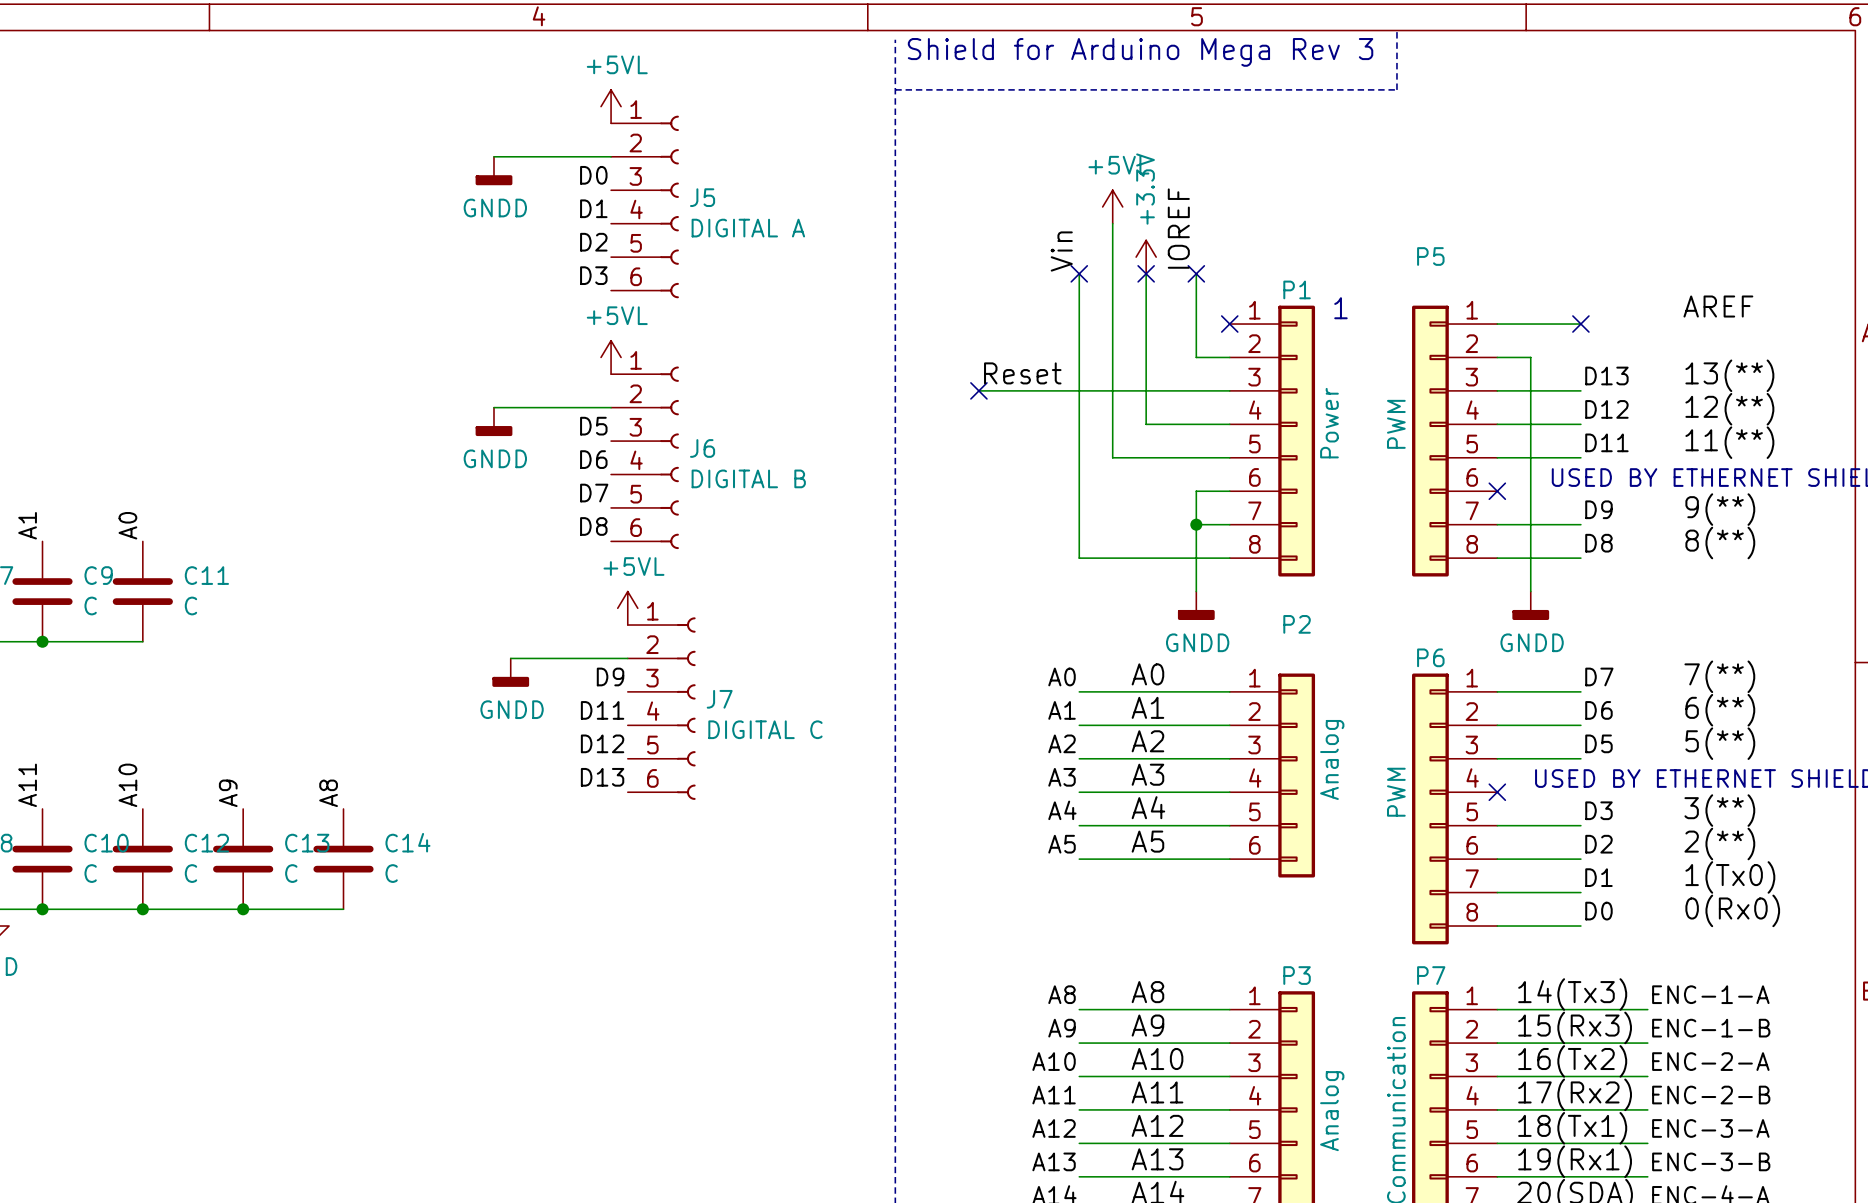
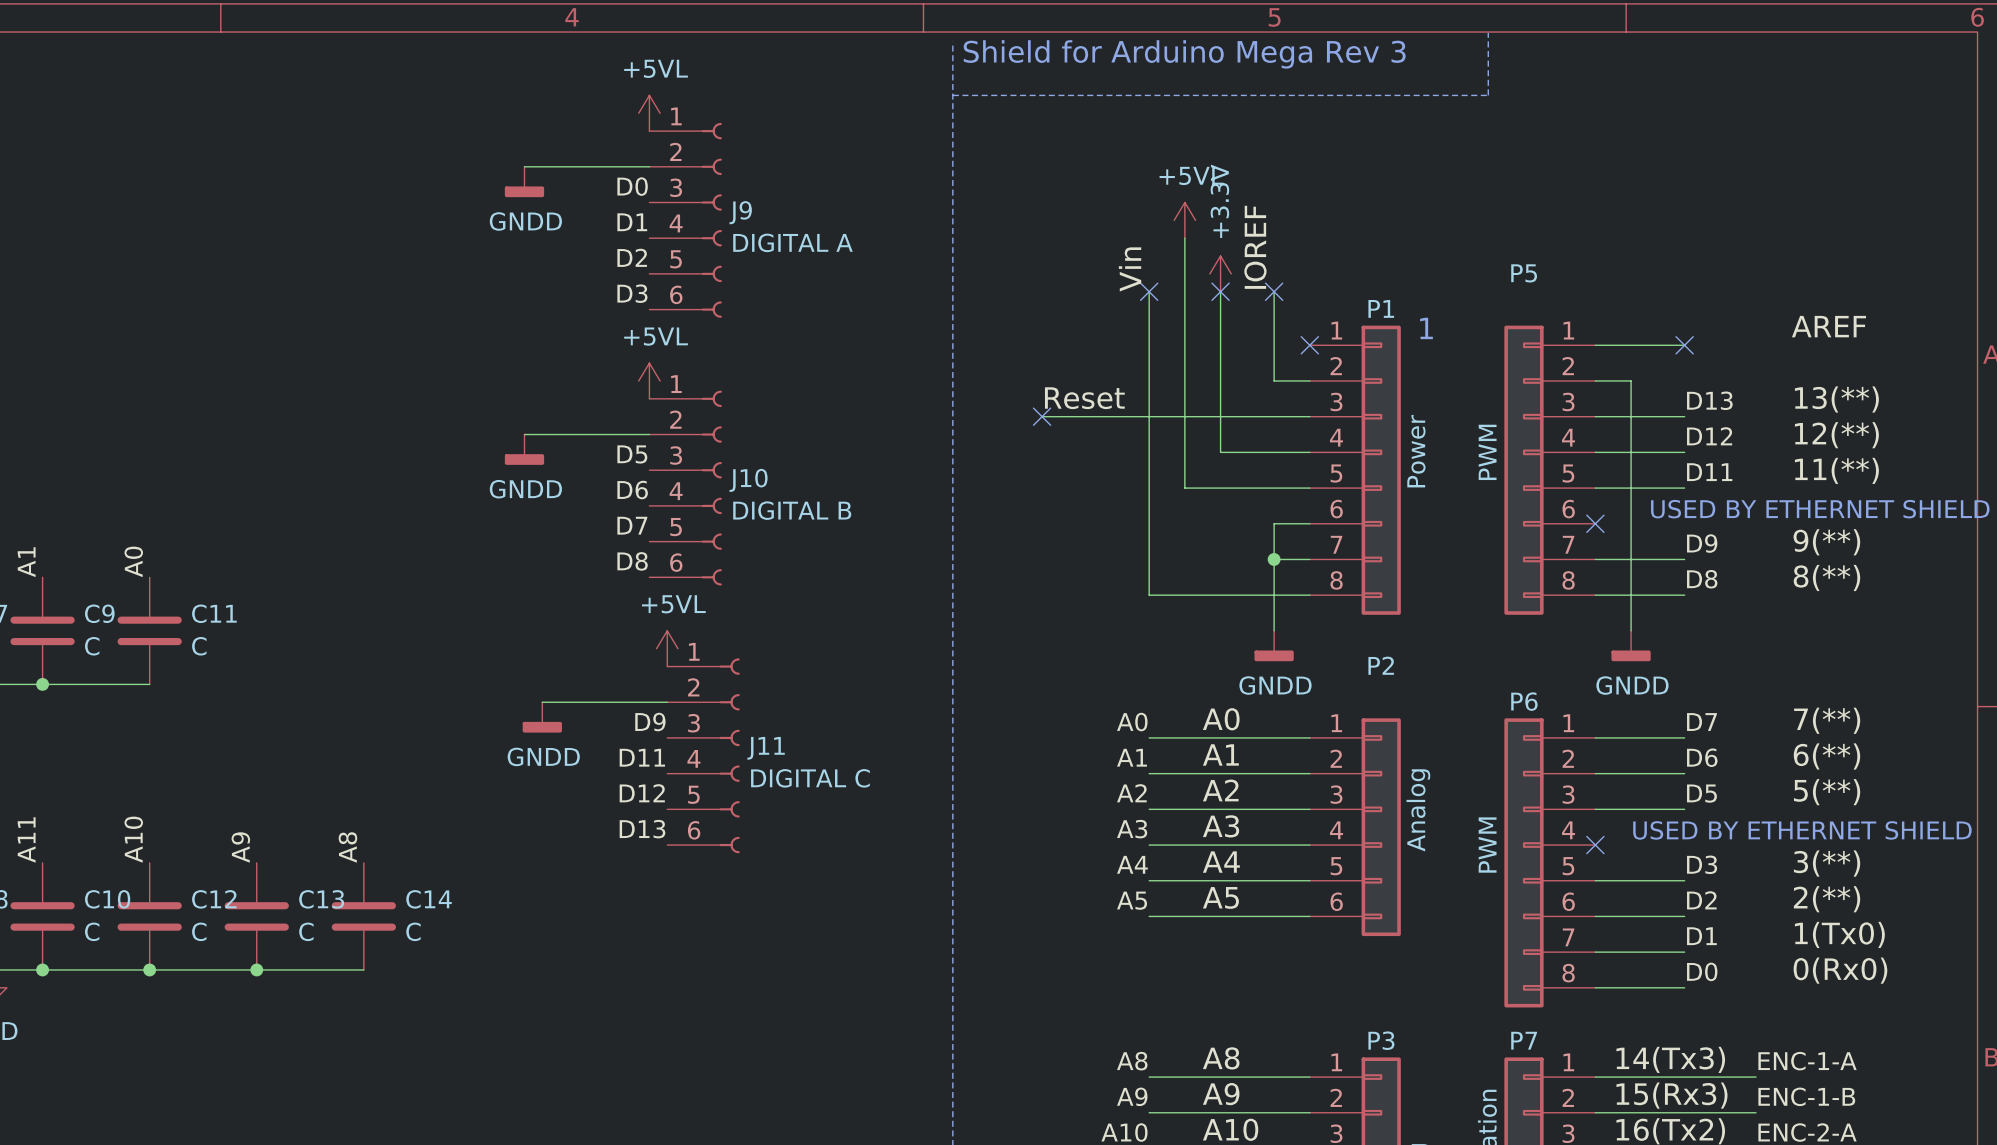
J5 name: J5 (702, 197) -> J9 (740, 212)
J6 name: J6 (702, 448) -> J10 (748, 480)
J7 name: J7 (719, 699) -> J11 (766, 748)

